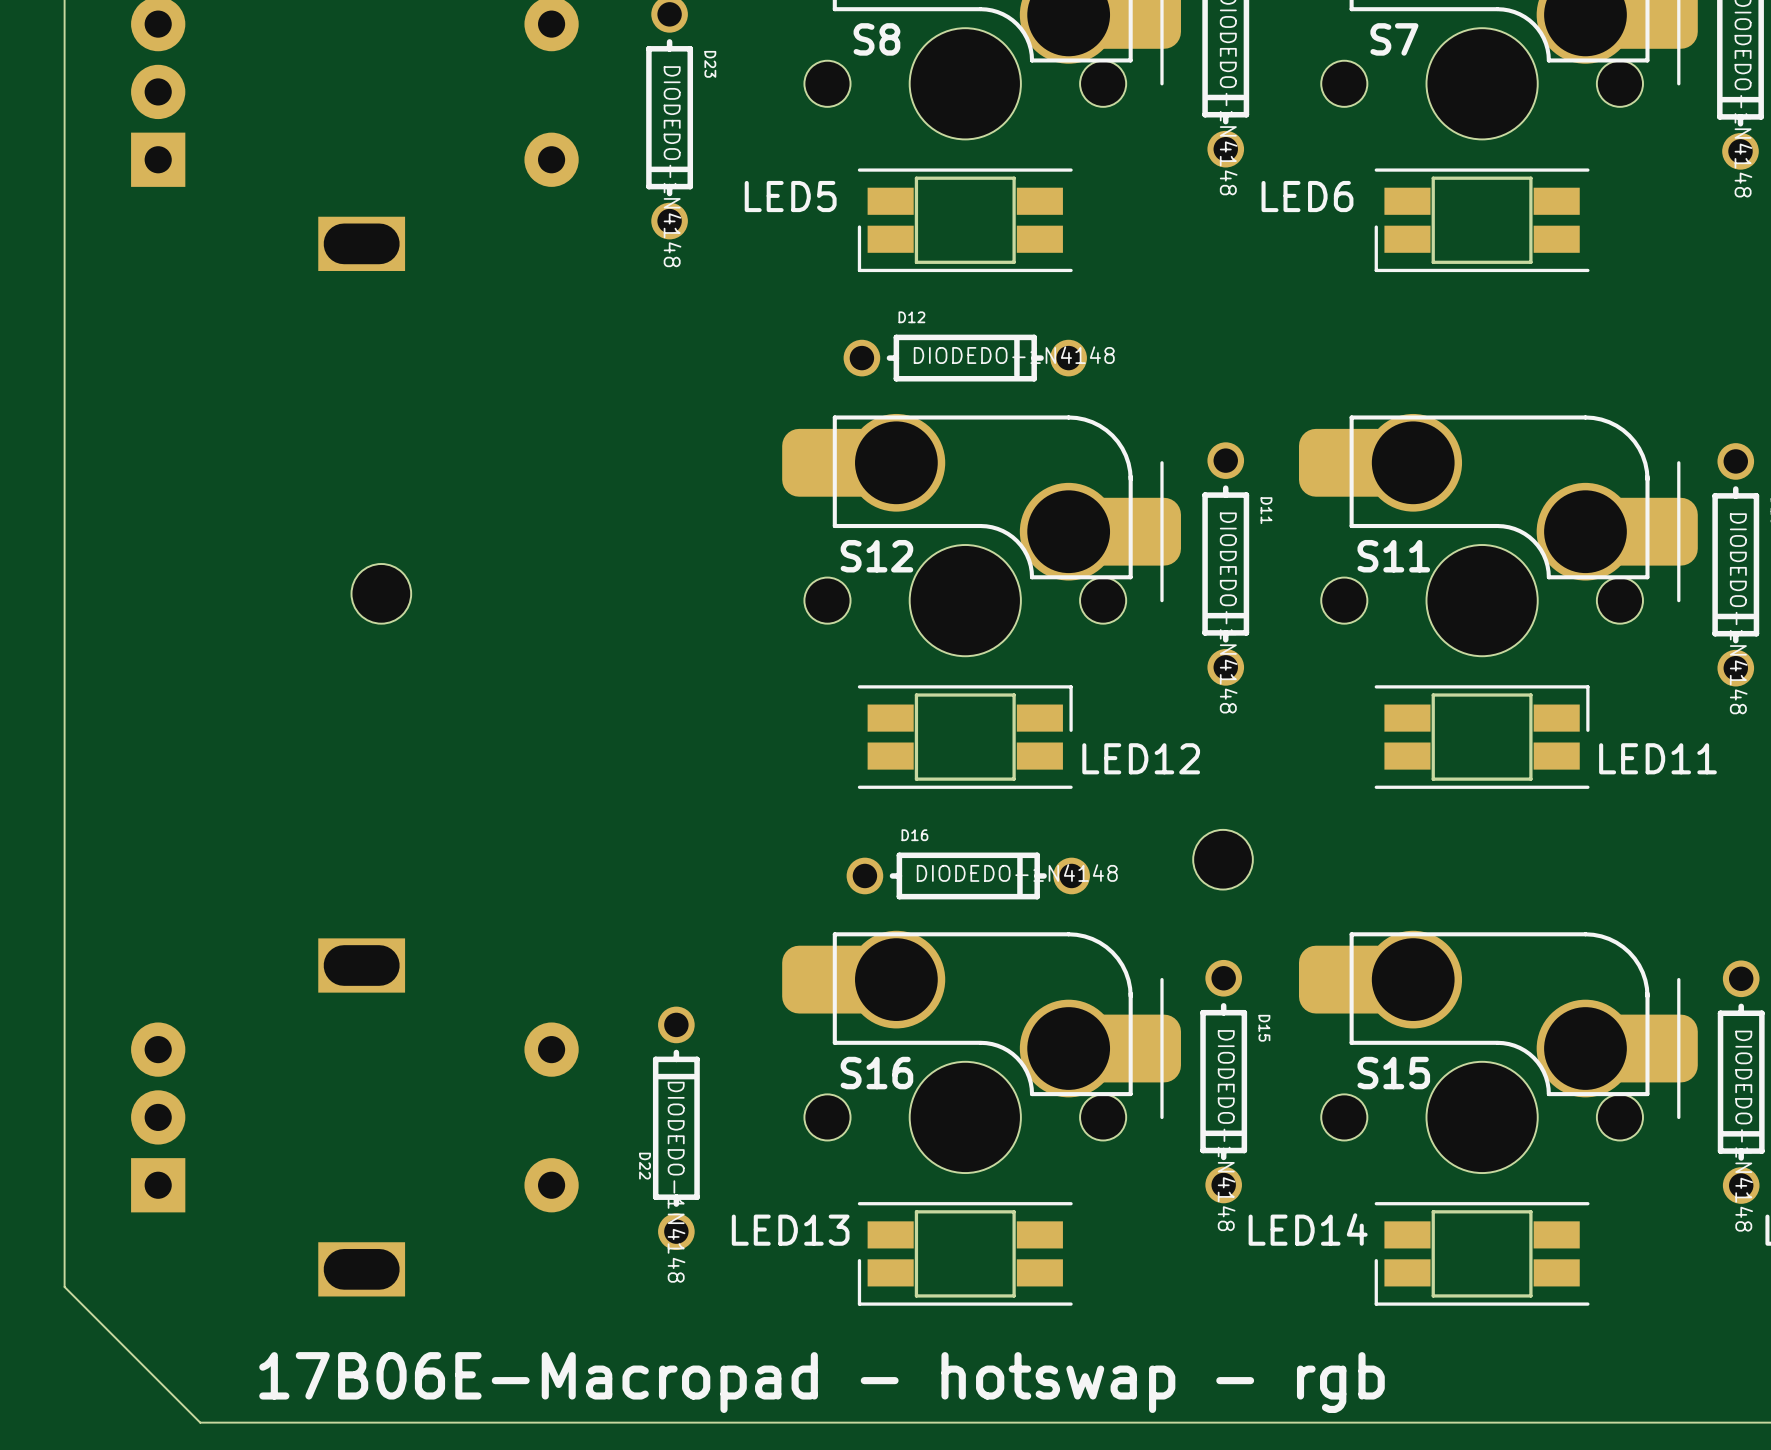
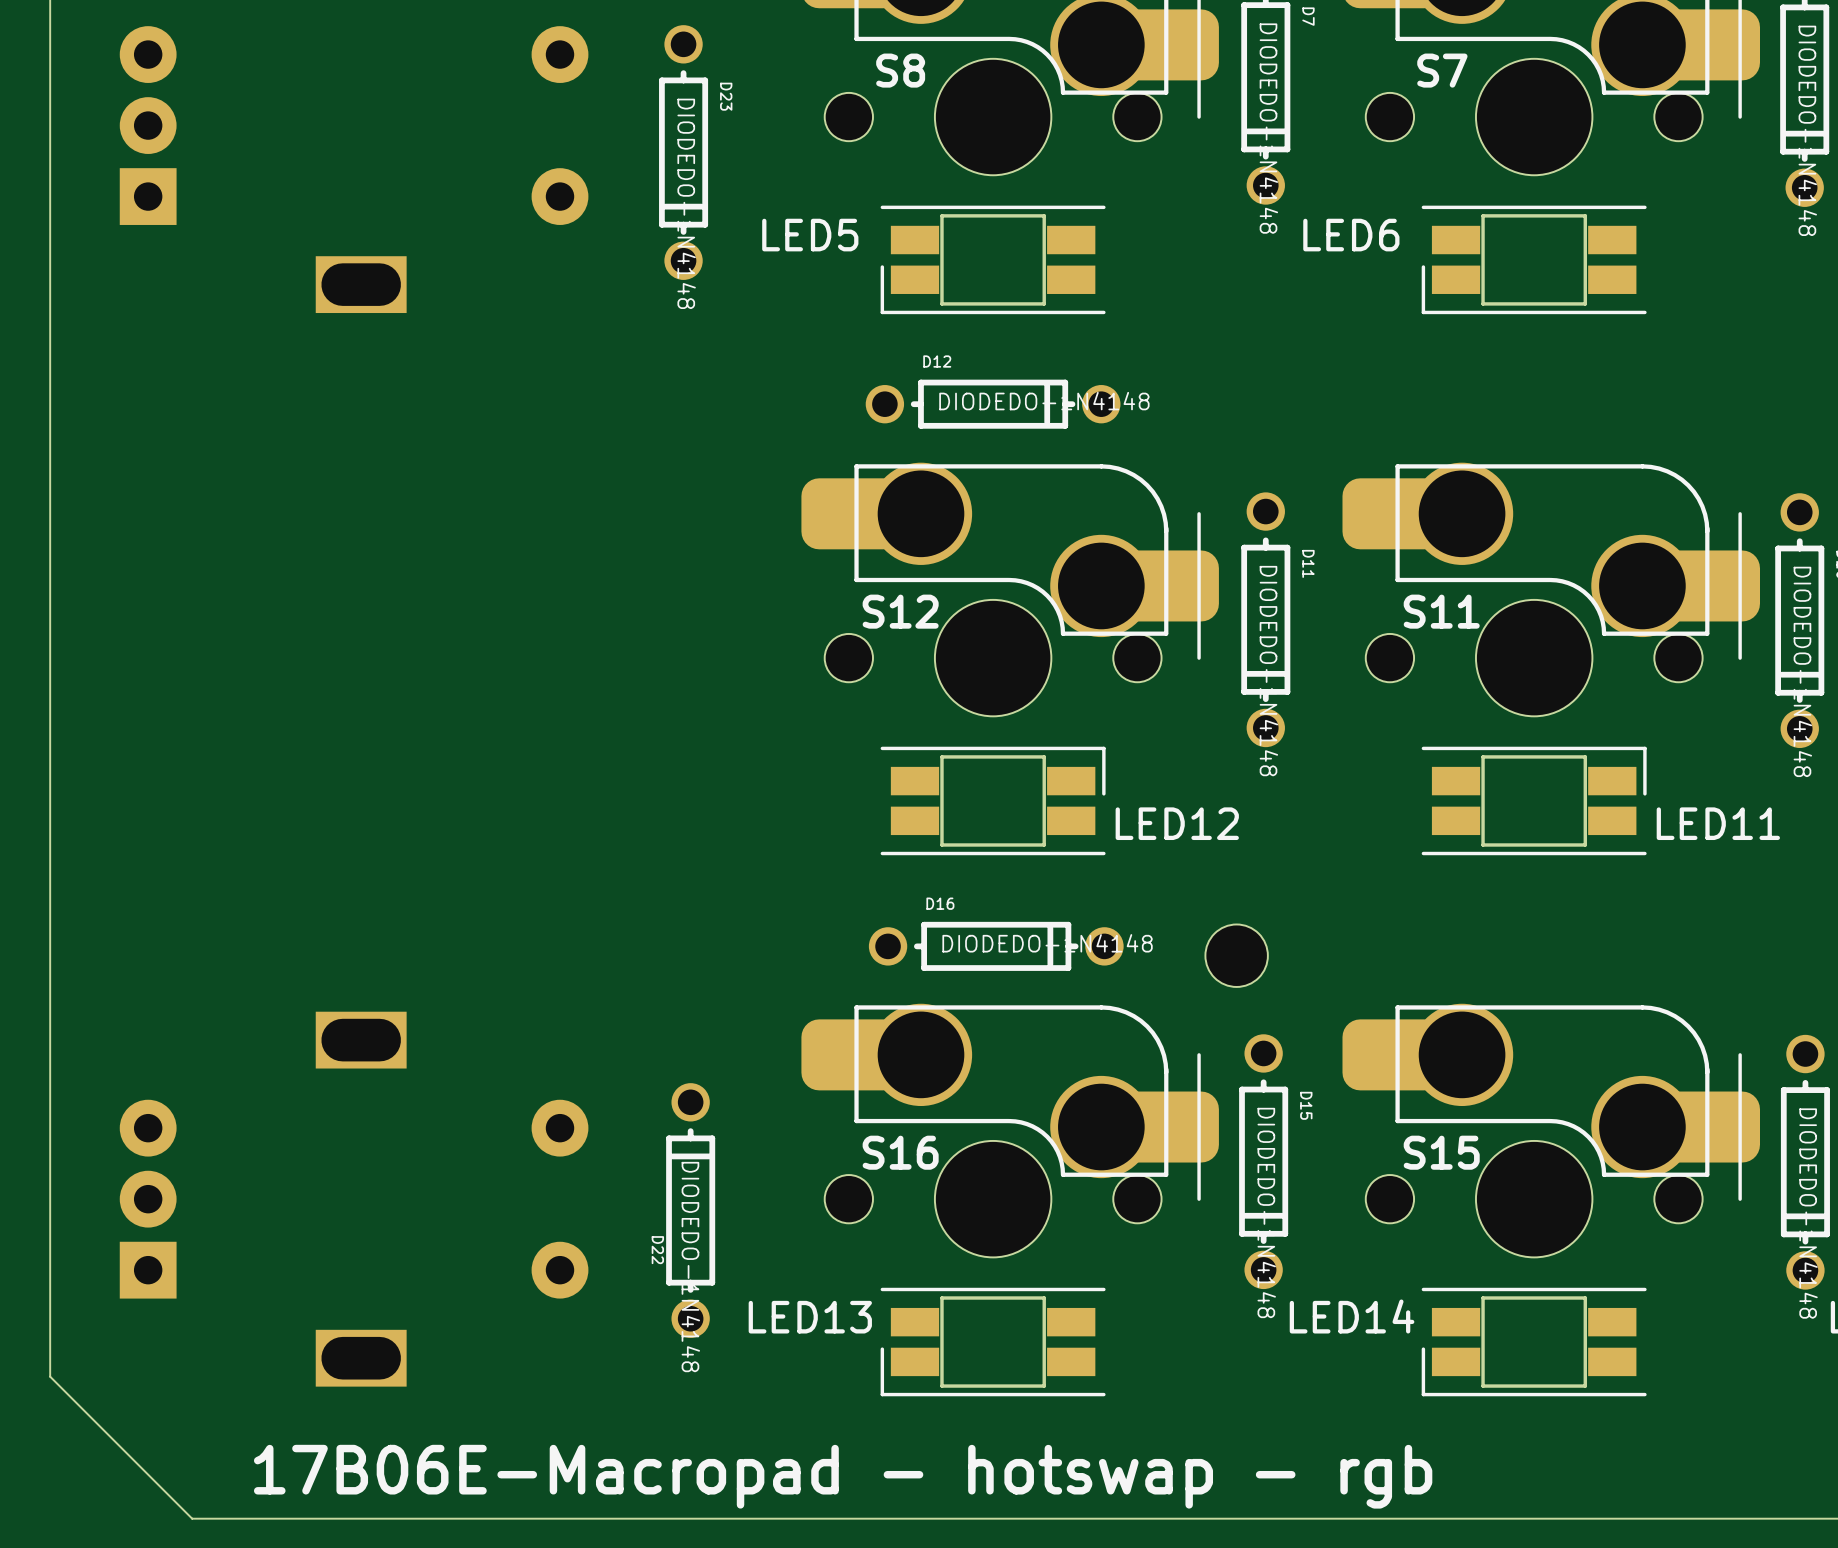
part: (381, 593) -> none
part position: (1223, 859) -> (1236, 955)

